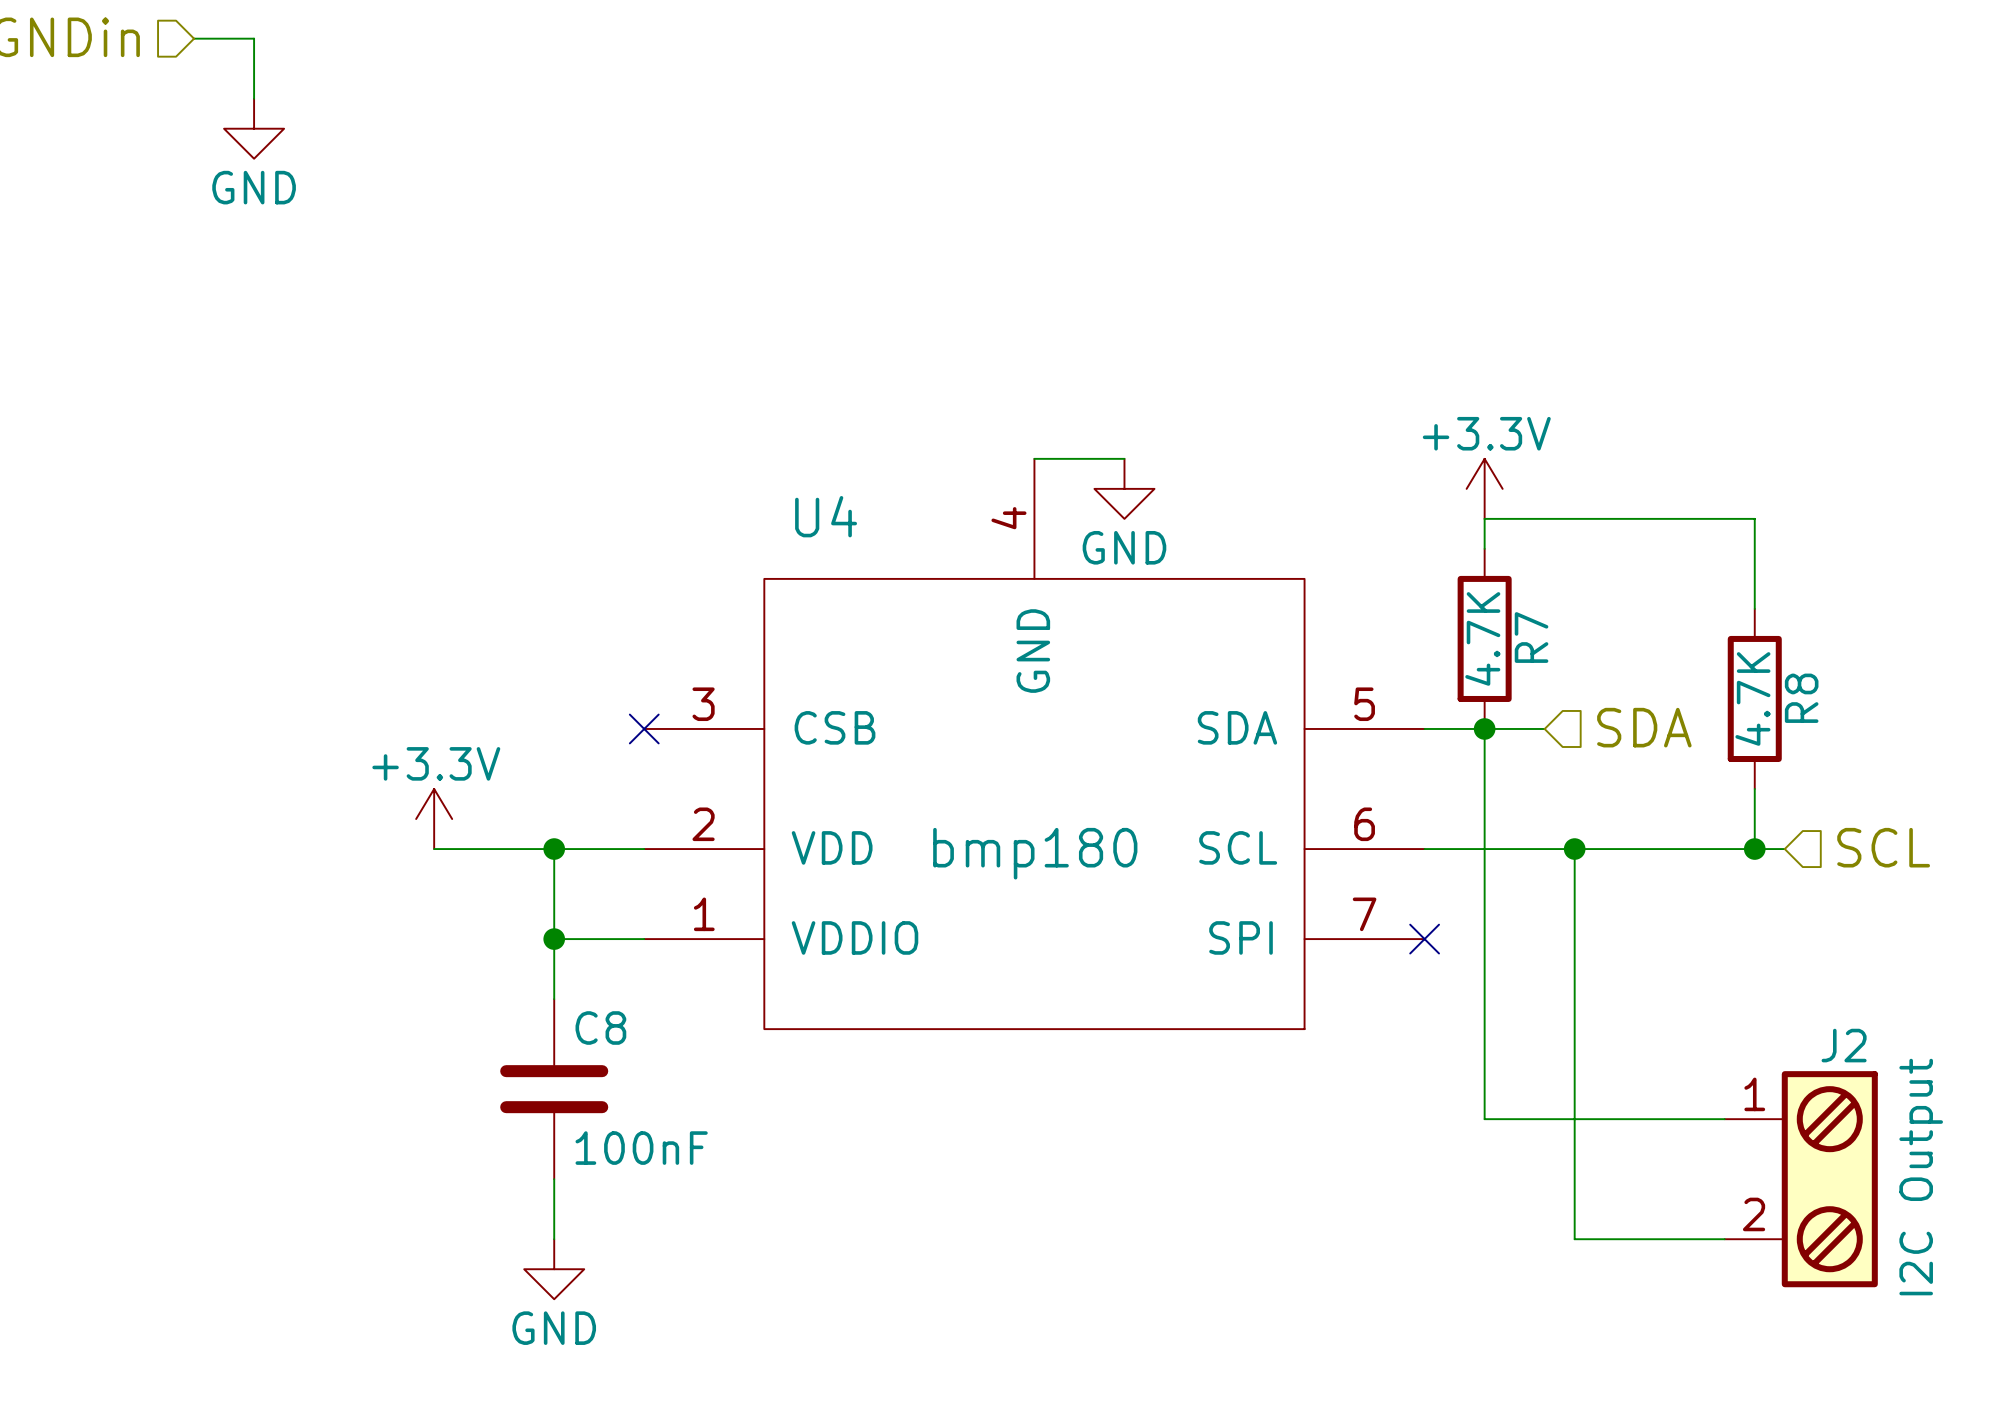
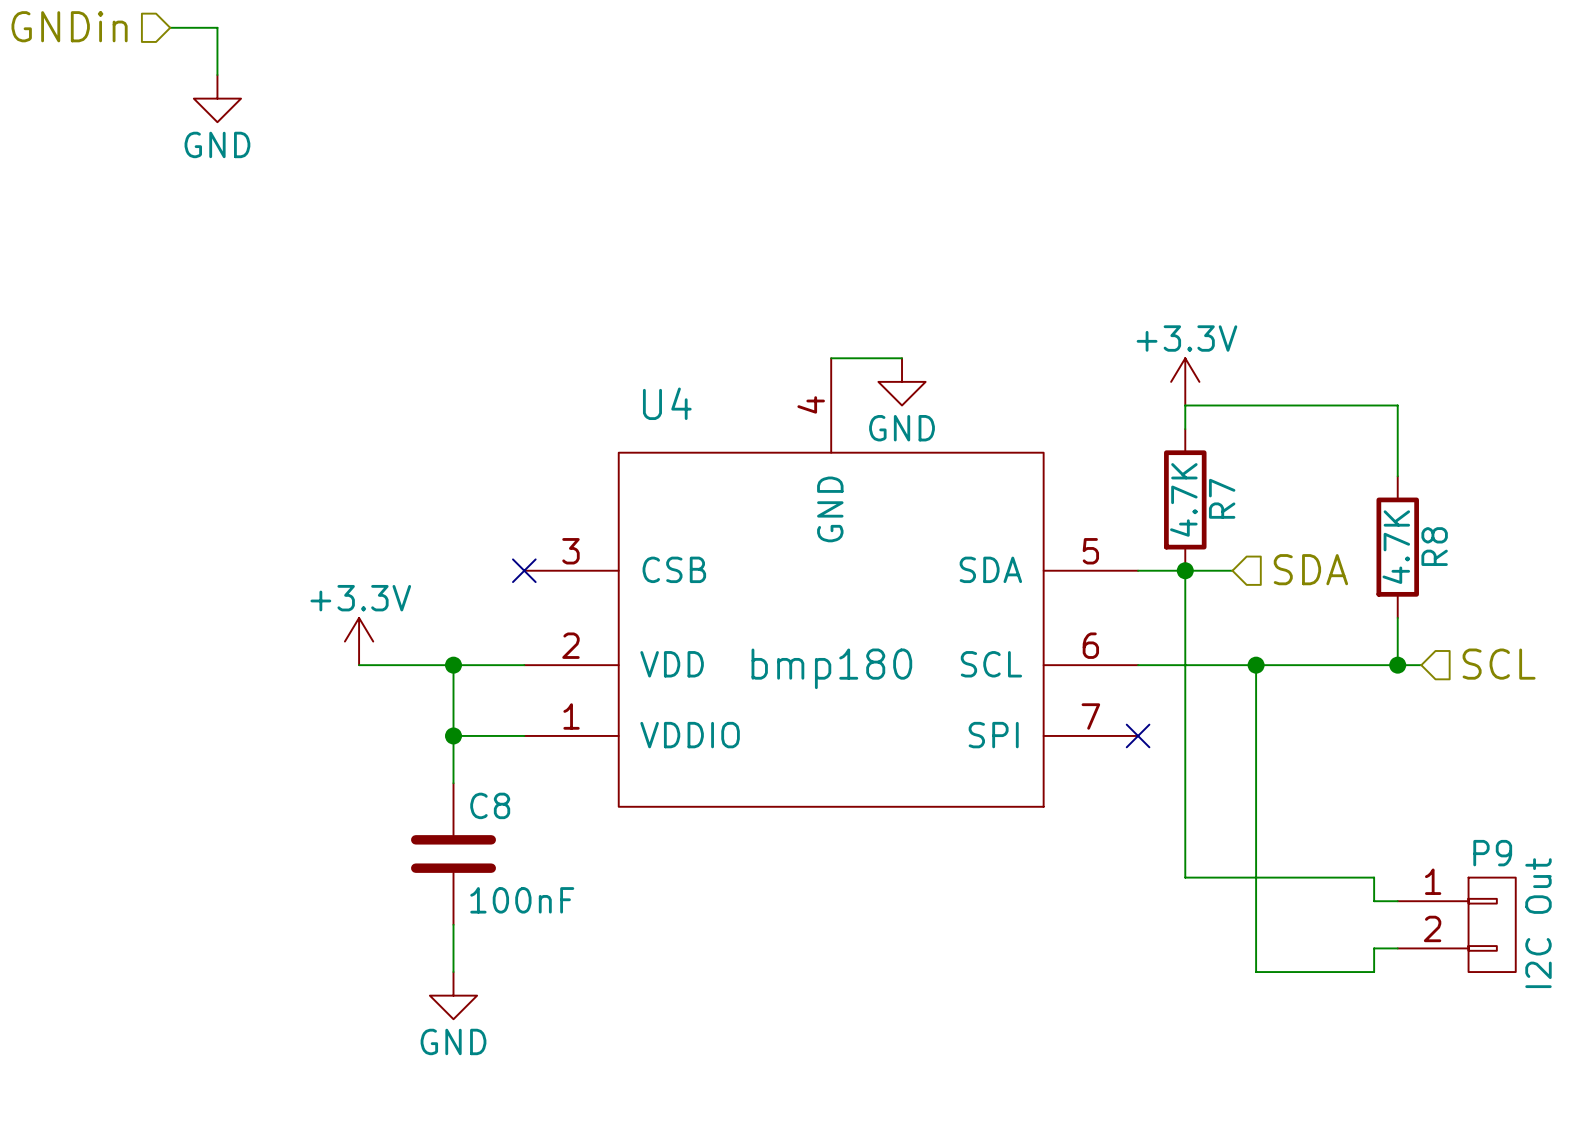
wire: none -> (1374, 877) (1374, 901) (1397, 901)
J2: I2C Output (1801, 1179) -> none
P9: none -> I2C Out (1456, 924)
wire: none -> (1397, 948) (1374, 948) (1374, 972)

